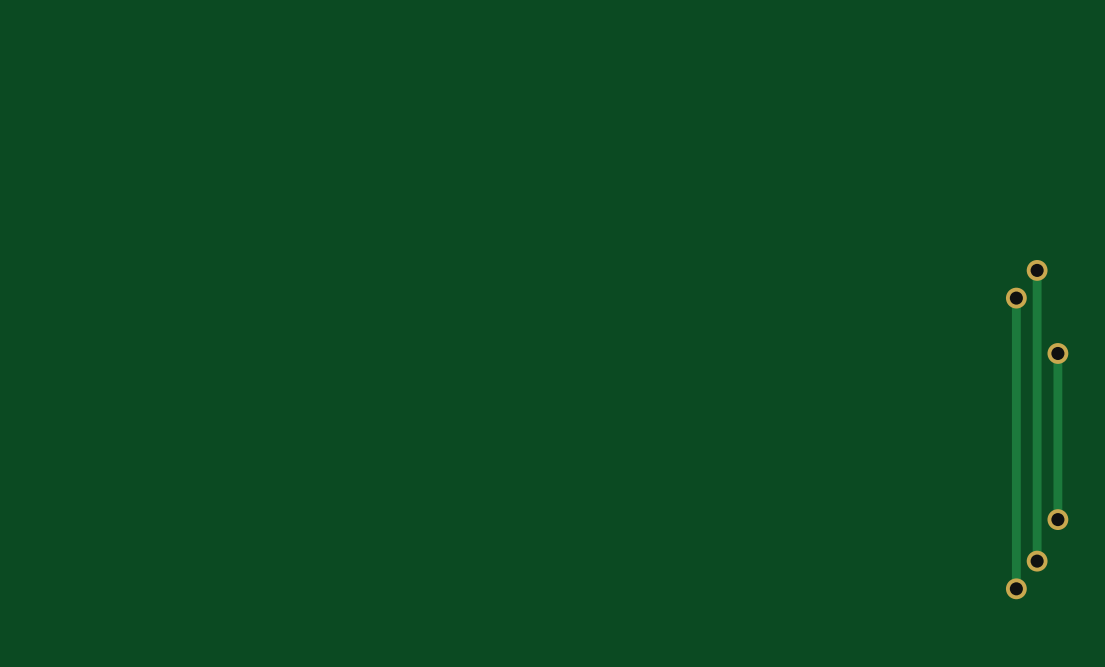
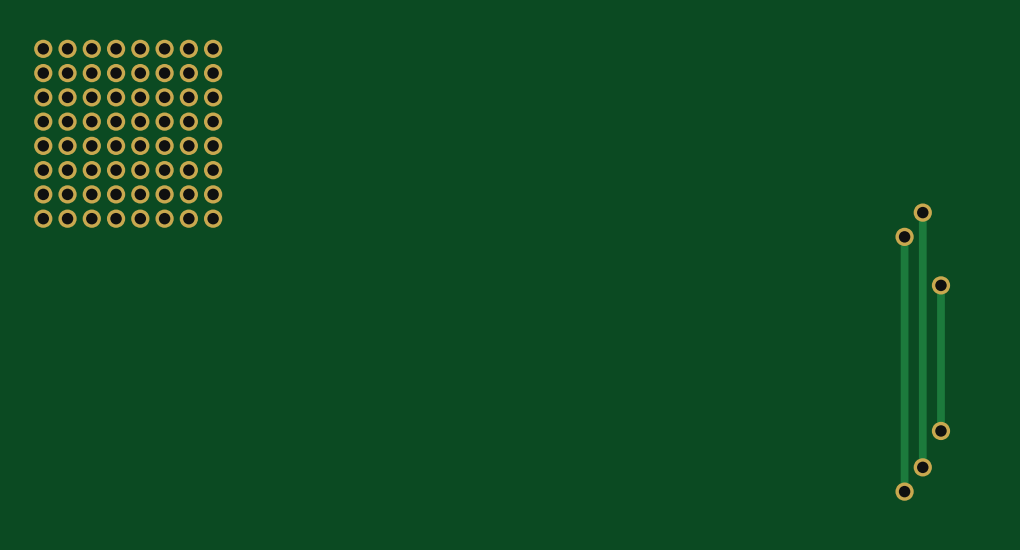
via: none -> (43, 48)
via: none -> (67, 48)
via: none -> (91, 48)
via: none -> (116, 48)
via: none -> (140, 48)
via: none -> (164, 48)
via: none -> (188, 48)
via: none -> (213, 48)
via: none -> (43, 73)
via: none -> (67, 73)
via: none -> (91, 73)
via: none -> (116, 73)
via: none -> (140, 73)
via: none -> (164, 73)
via: none -> (188, 73)
via: none -> (213, 73)
via: none -> (43, 97)
via: none -> (67, 97)
via: none -> (91, 97)
via: none -> (116, 97)
via: none -> (140, 97)
via: none -> (164, 97)
via: none -> (188, 97)
via: none -> (213, 97)
via: none -> (43, 121)
via: none -> (67, 121)
via: none -> (91, 121)
via: none -> (116, 121)
via: none -> (140, 121)
via: none -> (164, 121)
via: none -> (188, 121)
via: none -> (213, 121)
via: none -> (43, 145)
via: none -> (67, 145)
via: none -> (91, 145)
via: none -> (116, 145)
via: none -> (140, 145)
via: none -> (164, 145)
via: none -> (188, 145)
via: none -> (213, 145)
via: none -> (43, 170)
via: none -> (67, 170)
via: none -> (91, 170)
via: none -> (116, 170)
via: none -> (140, 170)
via: none -> (164, 170)
via: none -> (188, 170)
via: none -> (213, 170)
via: none -> (43, 194)
via: none -> (67, 194)
via: none -> (91, 194)
via: none -> (116, 194)
via: none -> (140, 194)
via: none -> (164, 194)
via: none -> (188, 194)
via: none -> (213, 194)
via: none -> (43, 218)
via: none -> (67, 218)
via: none -> (91, 218)
via: none -> (116, 218)
via: none -> (140, 218)
via: none -> (164, 218)
via: none -> (188, 218)
via: none -> (213, 218)

